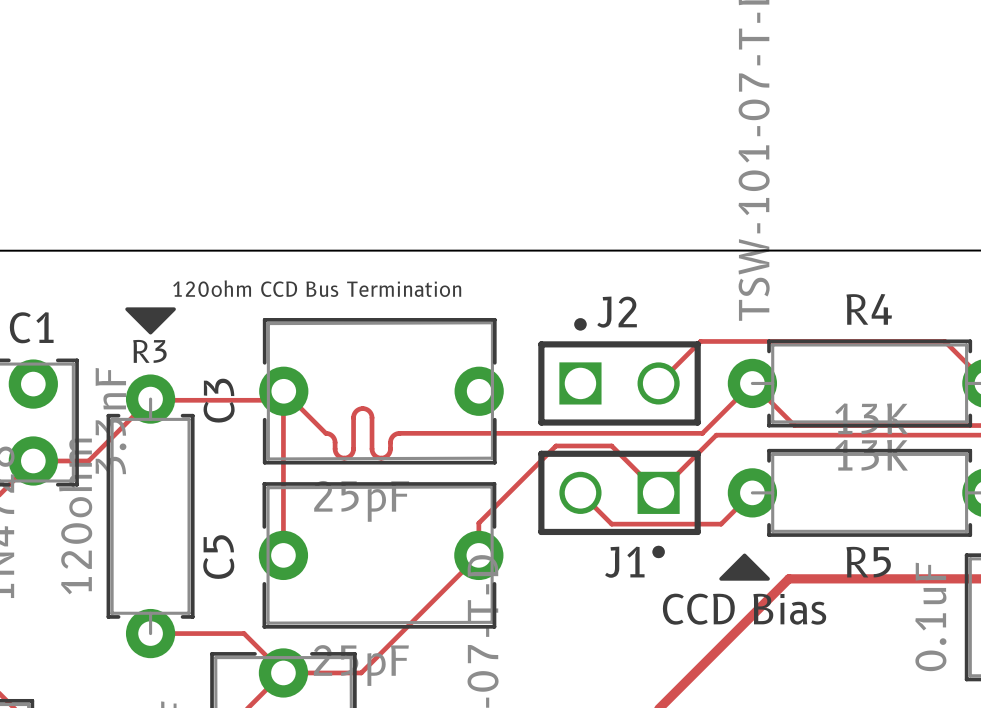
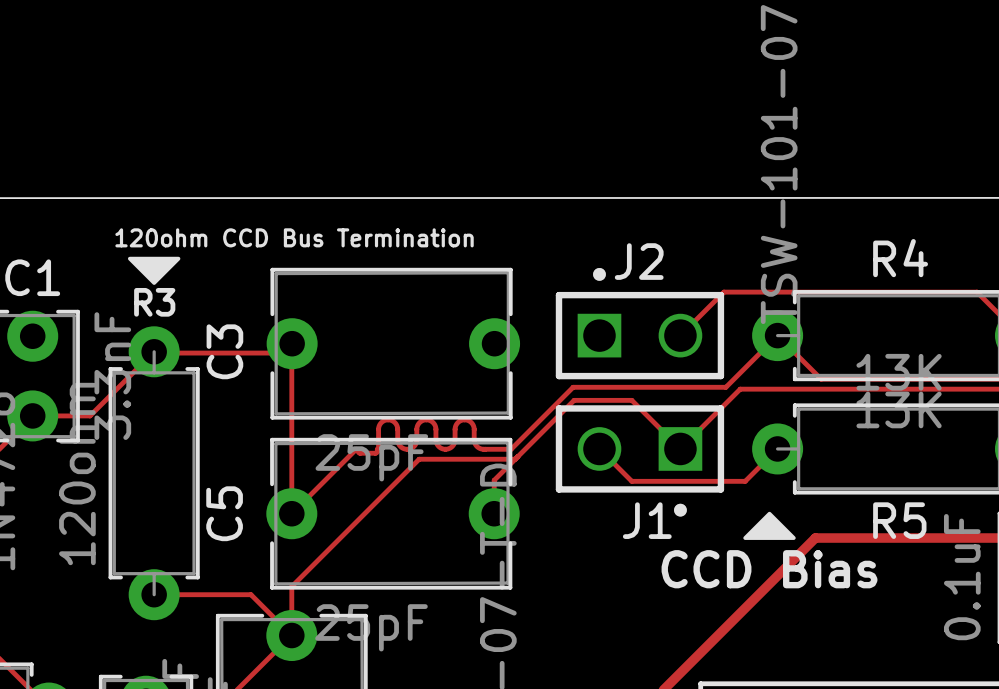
top track: (283, 391) (325, 433) (332, 436) (335, 452) (343, 458) (348, 456) (352, 452) (353, 415) (357, 410) (361, 408) (367, 409) (371, 414) (372, 451) (374, 455) (380, 458) (388, 454) (391, 439) (398, 433) (555, 433) -> (291, 513) (356, 449) (359, 453) (376, 452) (378, 449) (378, 426) (384, 420) (390, 420) (395, 423) (398, 443) (404, 448) (409, 448) (414, 445) (417, 425) (420, 421) (426, 419) (431, 421) (435, 425) (437, 445) (443, 448) (449, 448) (454, 442) (456, 424) (464, 419) (472, 424) (474, 442) (478, 448) (511, 449) (573, 387)
top track: (478, 555) (361, 672) (283, 672) -> (515, 459) (419, 459) (291, 586) (291, 635)

